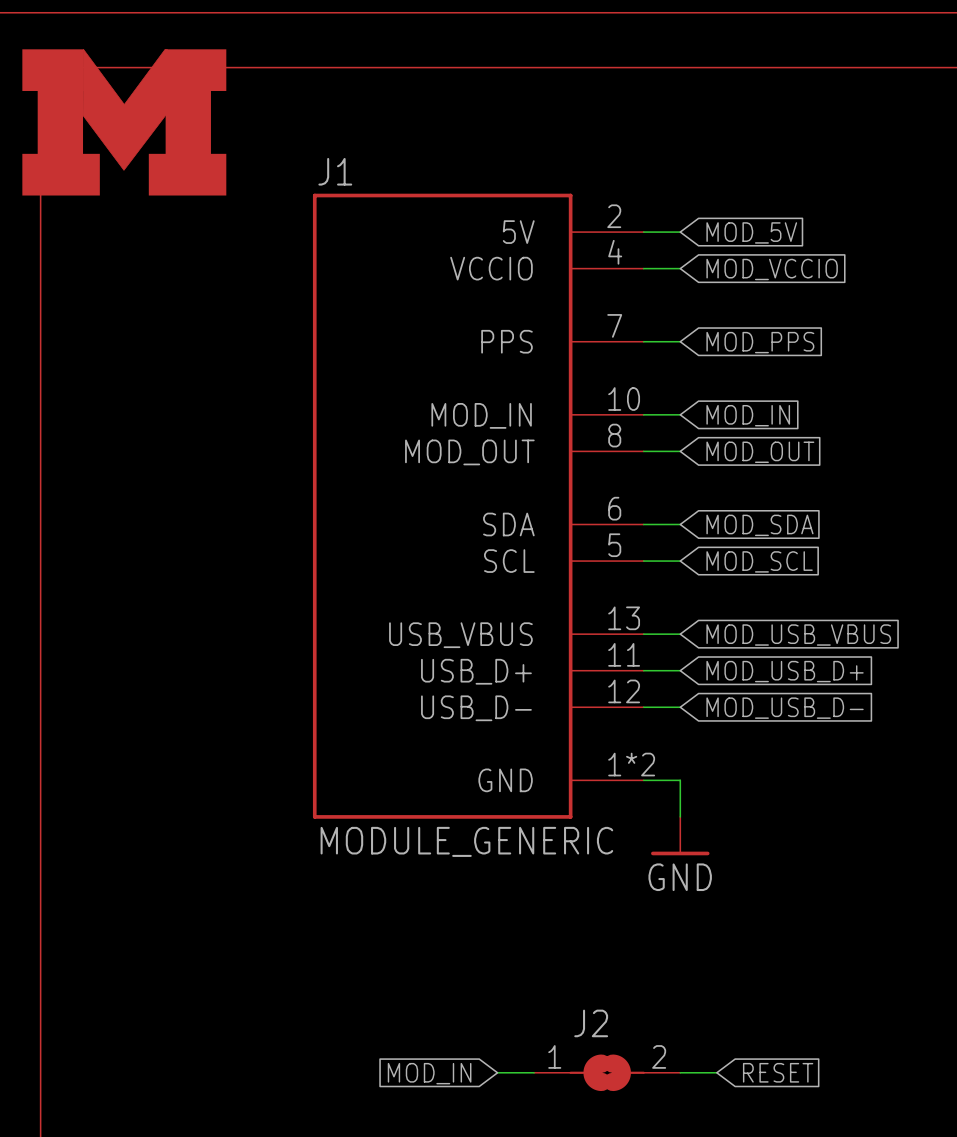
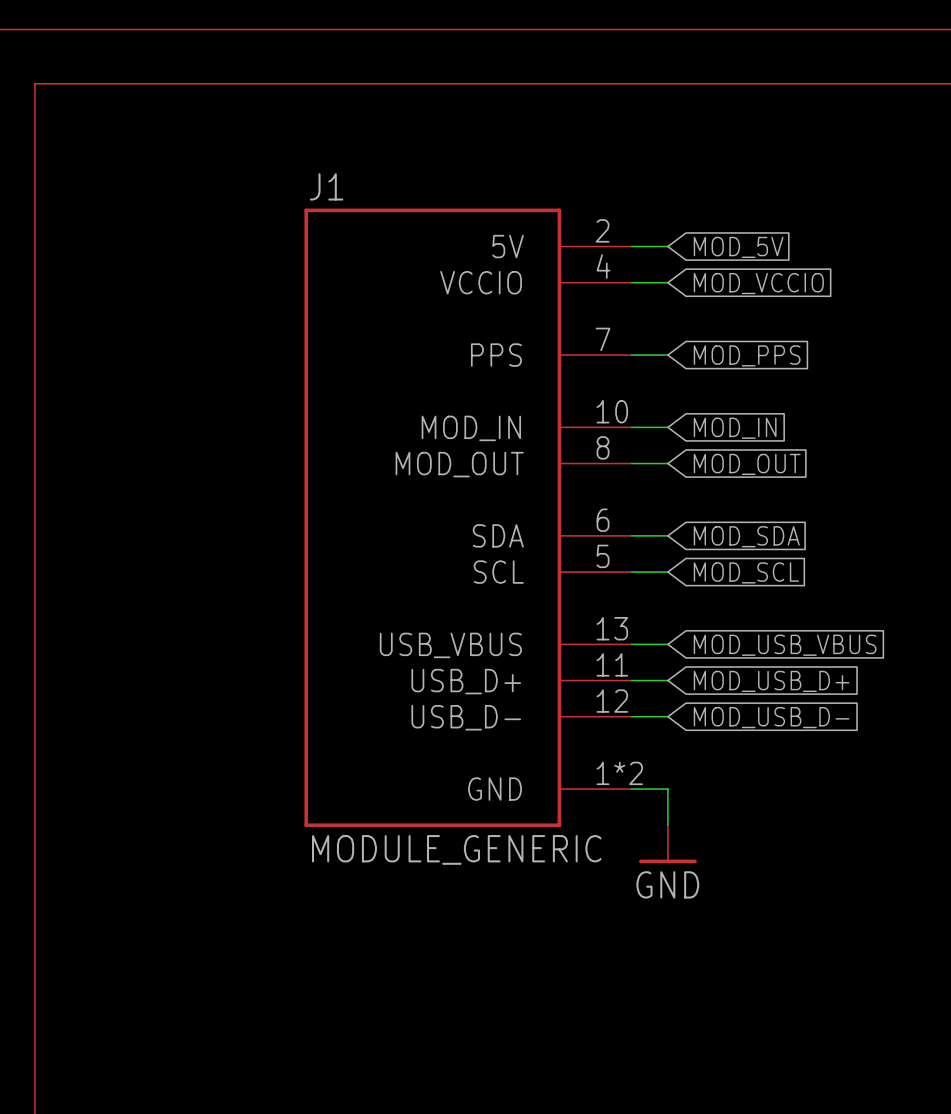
part: (124, 122) -> none
wire: (497, 1072) (534, 1072) -> none
J2: (607, 1072) -> none
wire: (680, 1072) (716, 1072) -> none
global label: RESET (778, 1072) -> none
global label: MOD_IN (429, 1073) -> none

